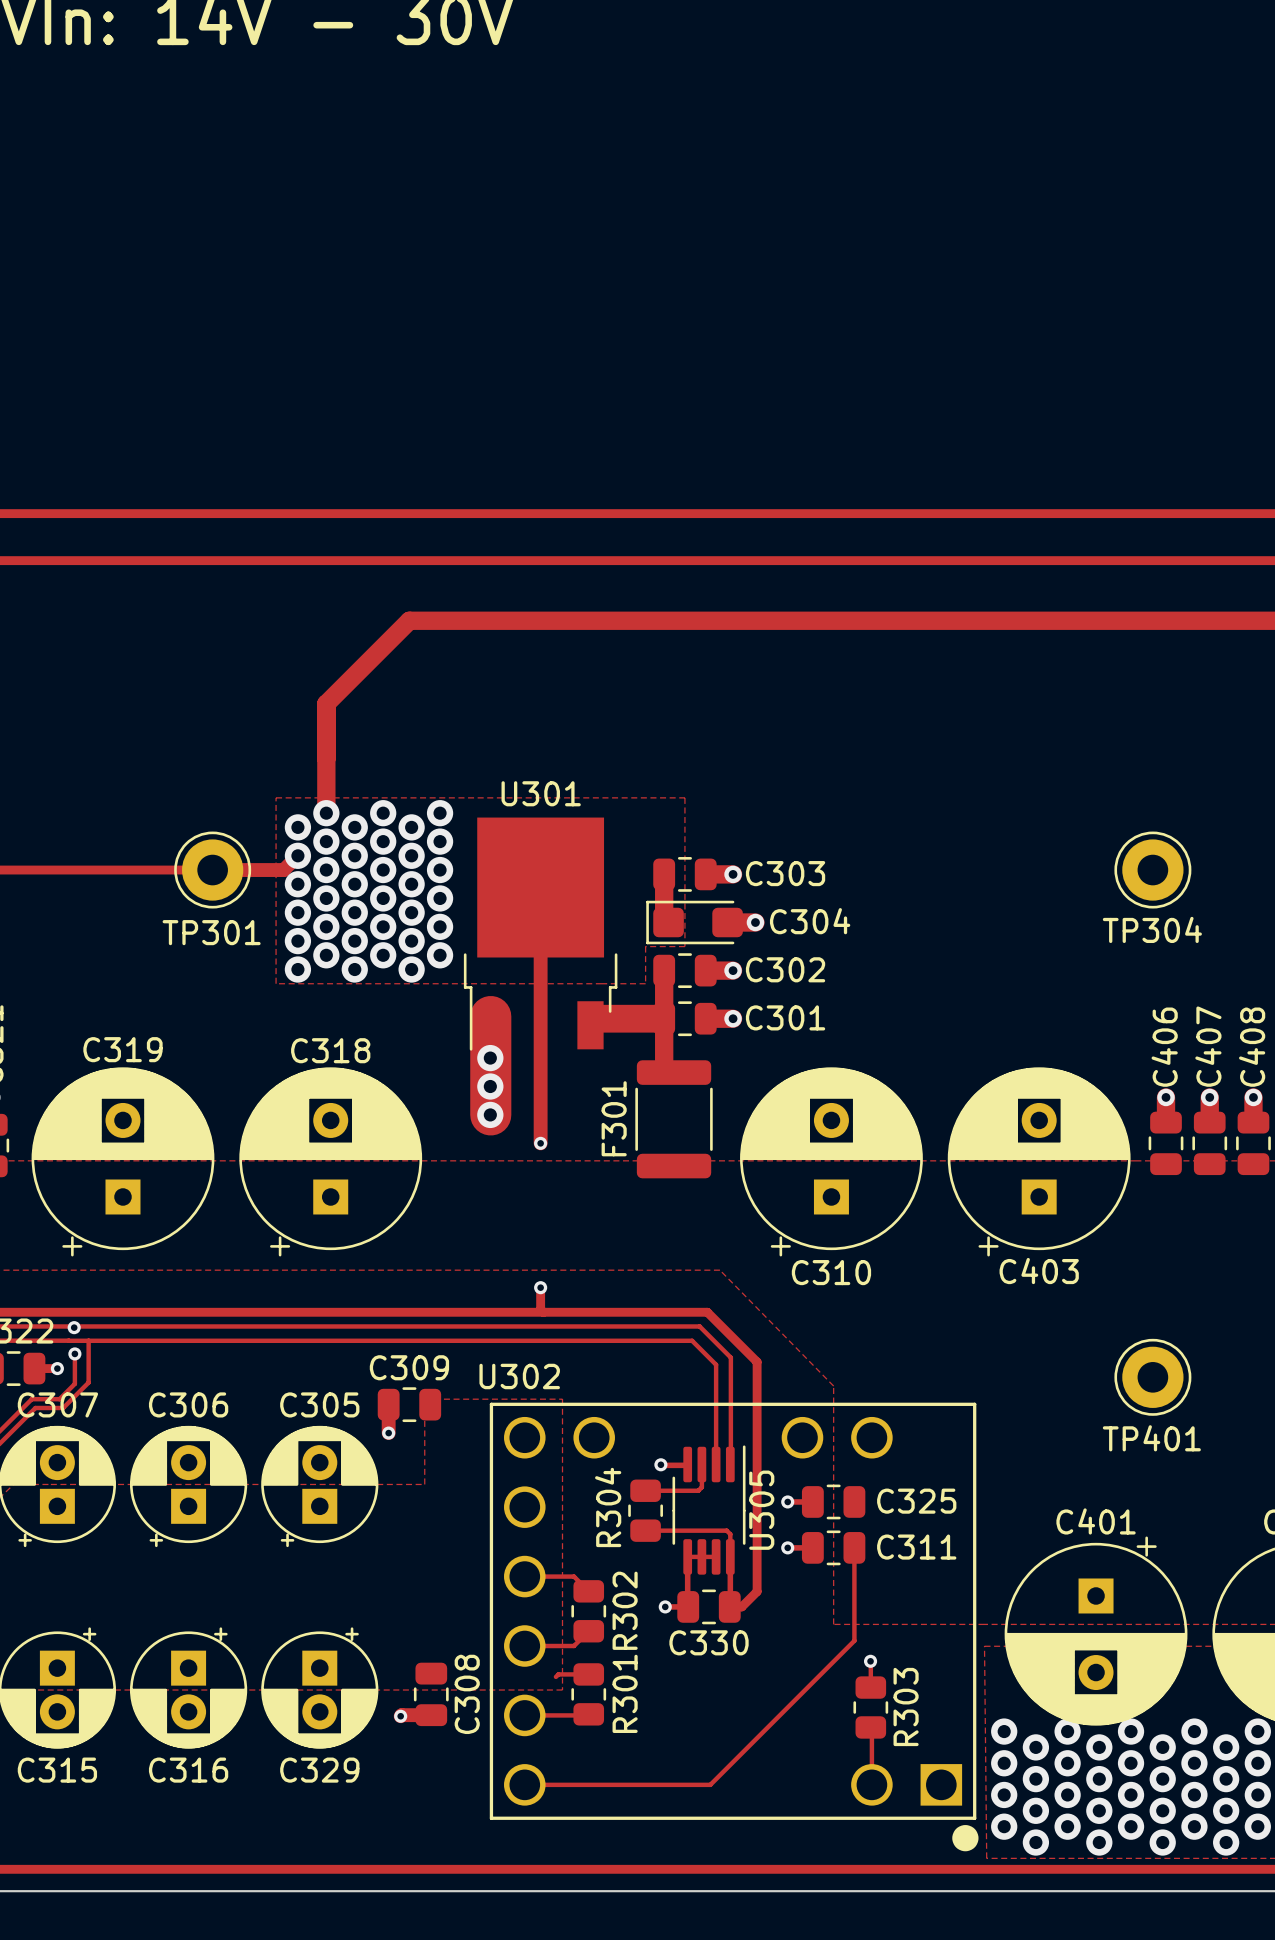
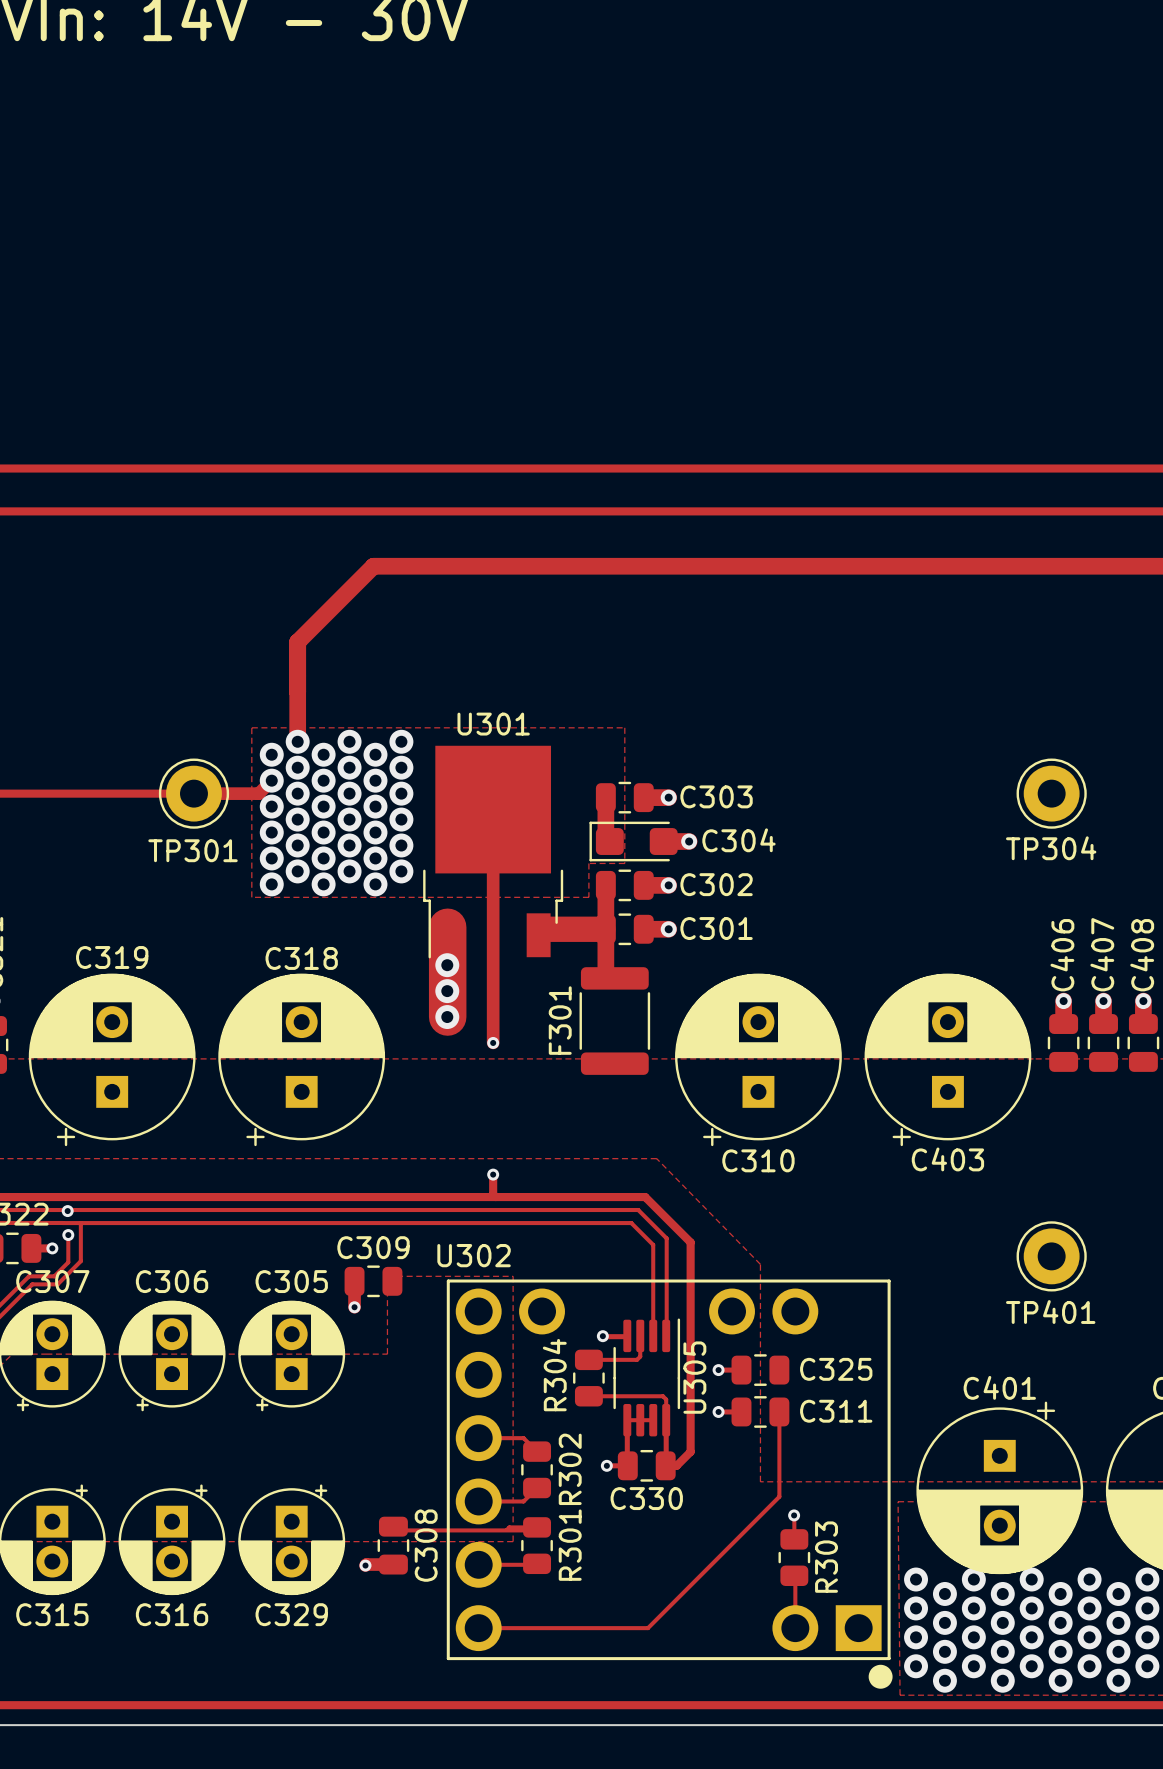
U302 footprint: [489, 1402, 979, 1852] -> [446, 1279, 893, 1689]
track: none -> (393, 1526) (397, 1530) (534, 1530) (537, 1527)

